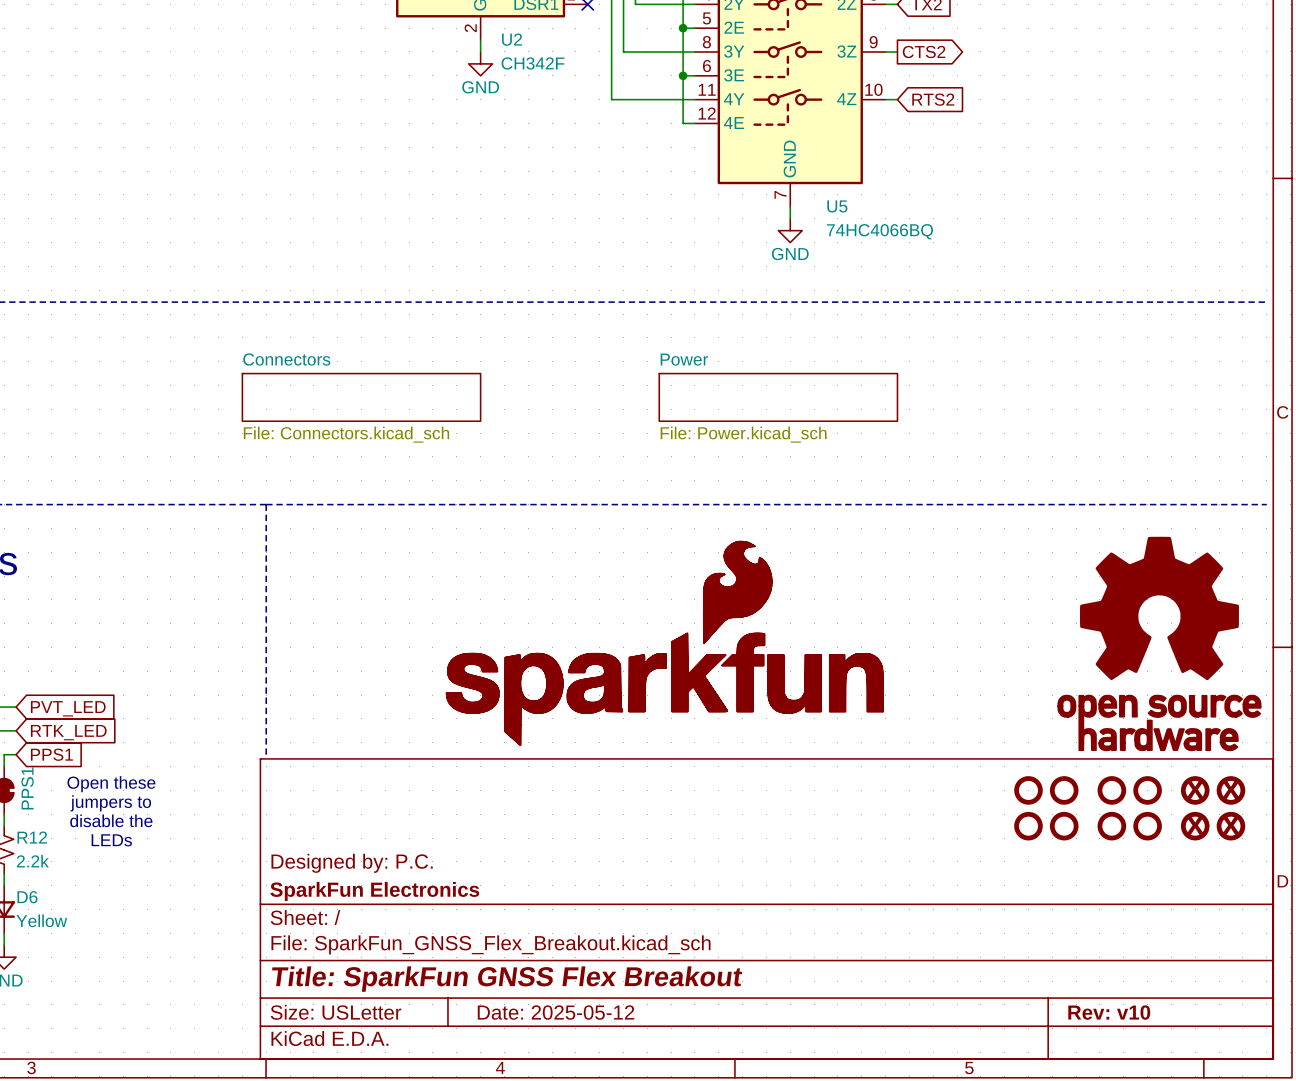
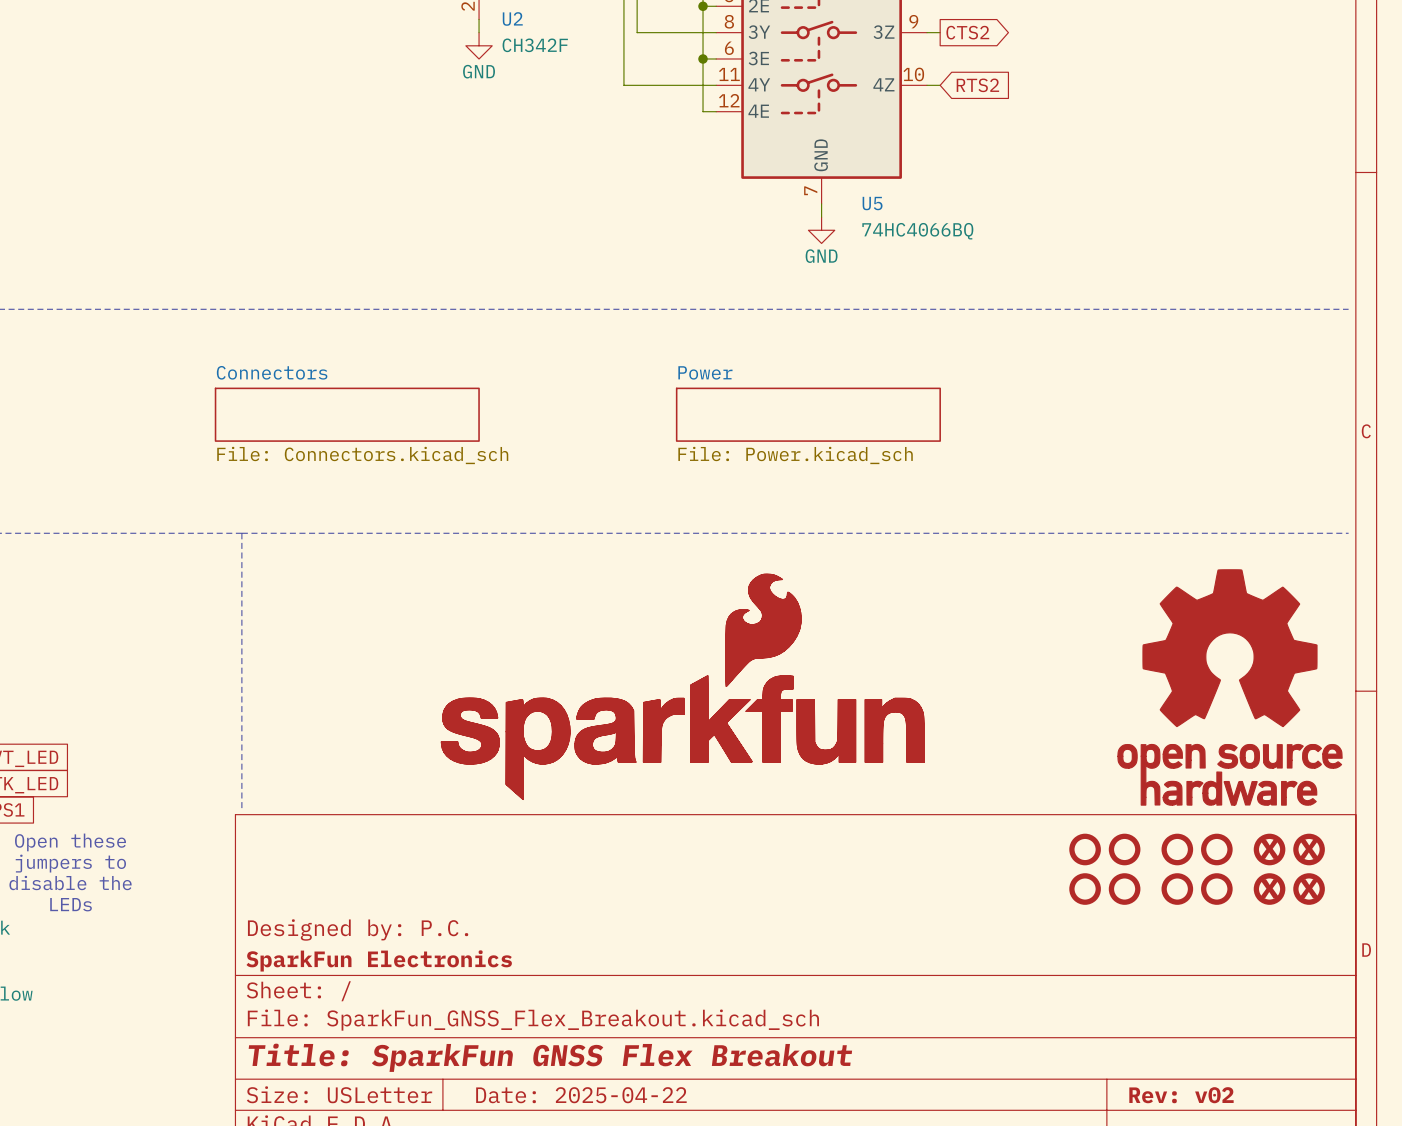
title block: Date: 2025-05-12 (556, 1012) -> Date: 2025-04-22 (581, 1095)
title block: Rev: v10 (1109, 1012) -> Rev: v02 (1181, 1095)

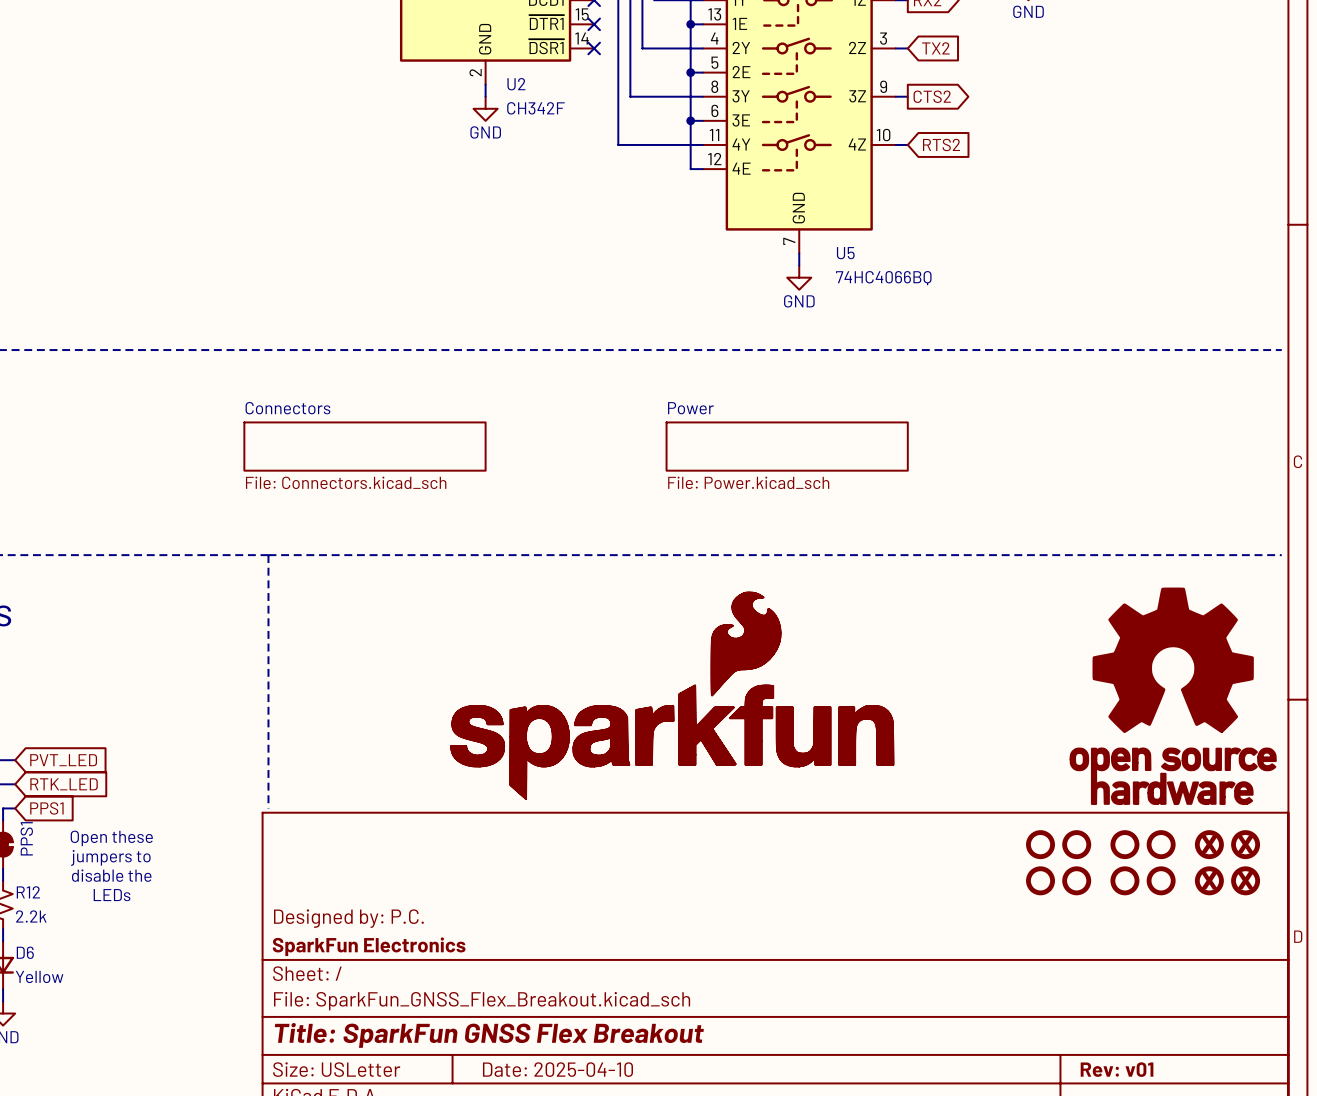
title block: Date: 2025-04-22 (581, 1095) -> Date: 2025-04-10 (557, 1069)
title block: Rev: v02 (1181, 1095) -> Rev: v01 (1117, 1069)

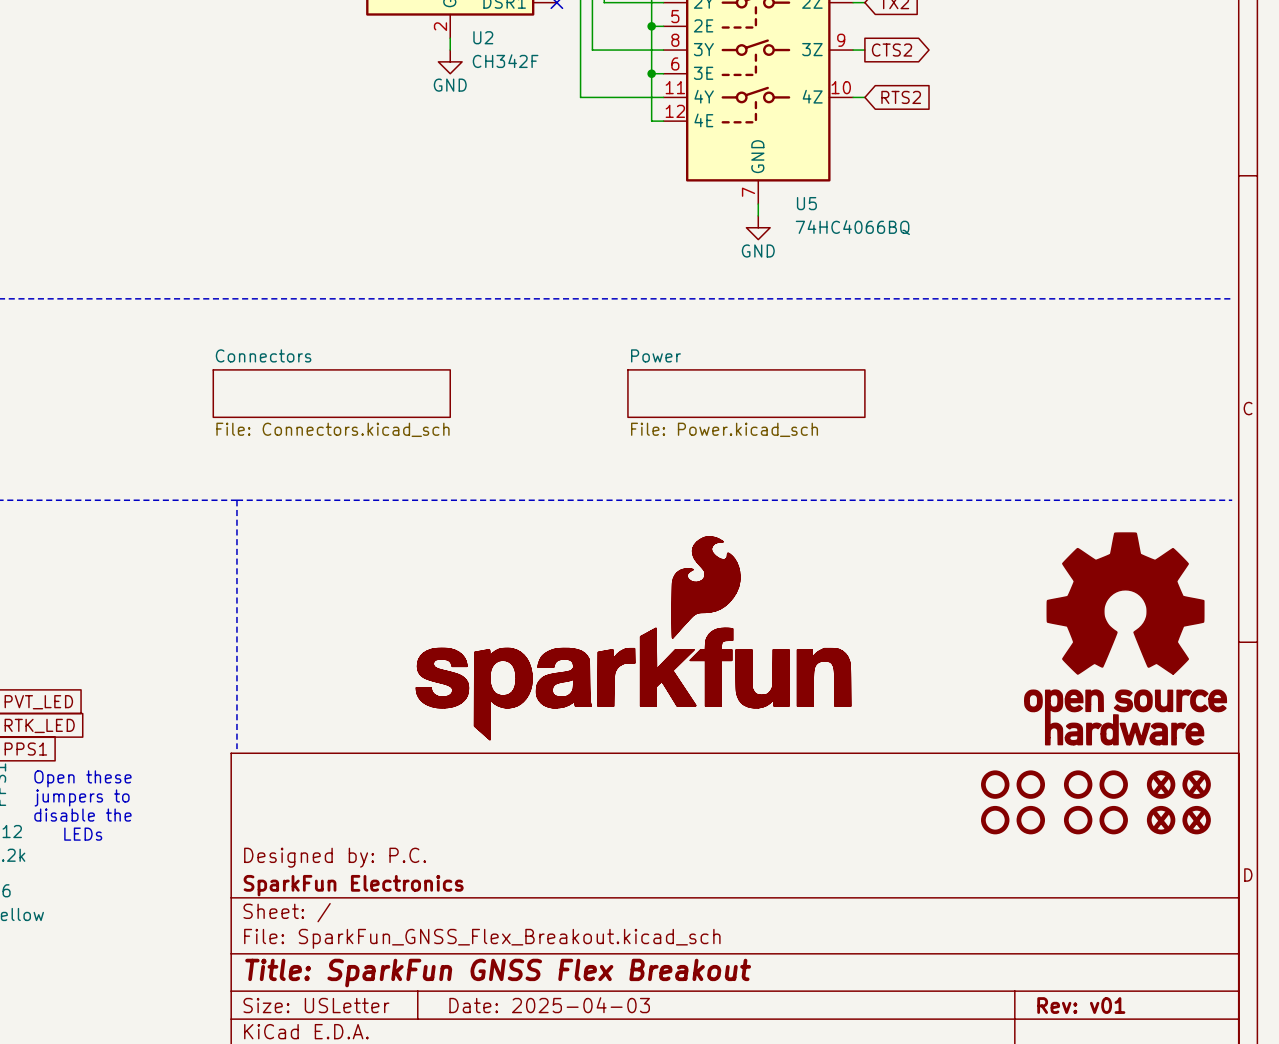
title block: Date: 2025-04-10 (557, 1069) -> Date: 2025-04-03 (549, 1005)

